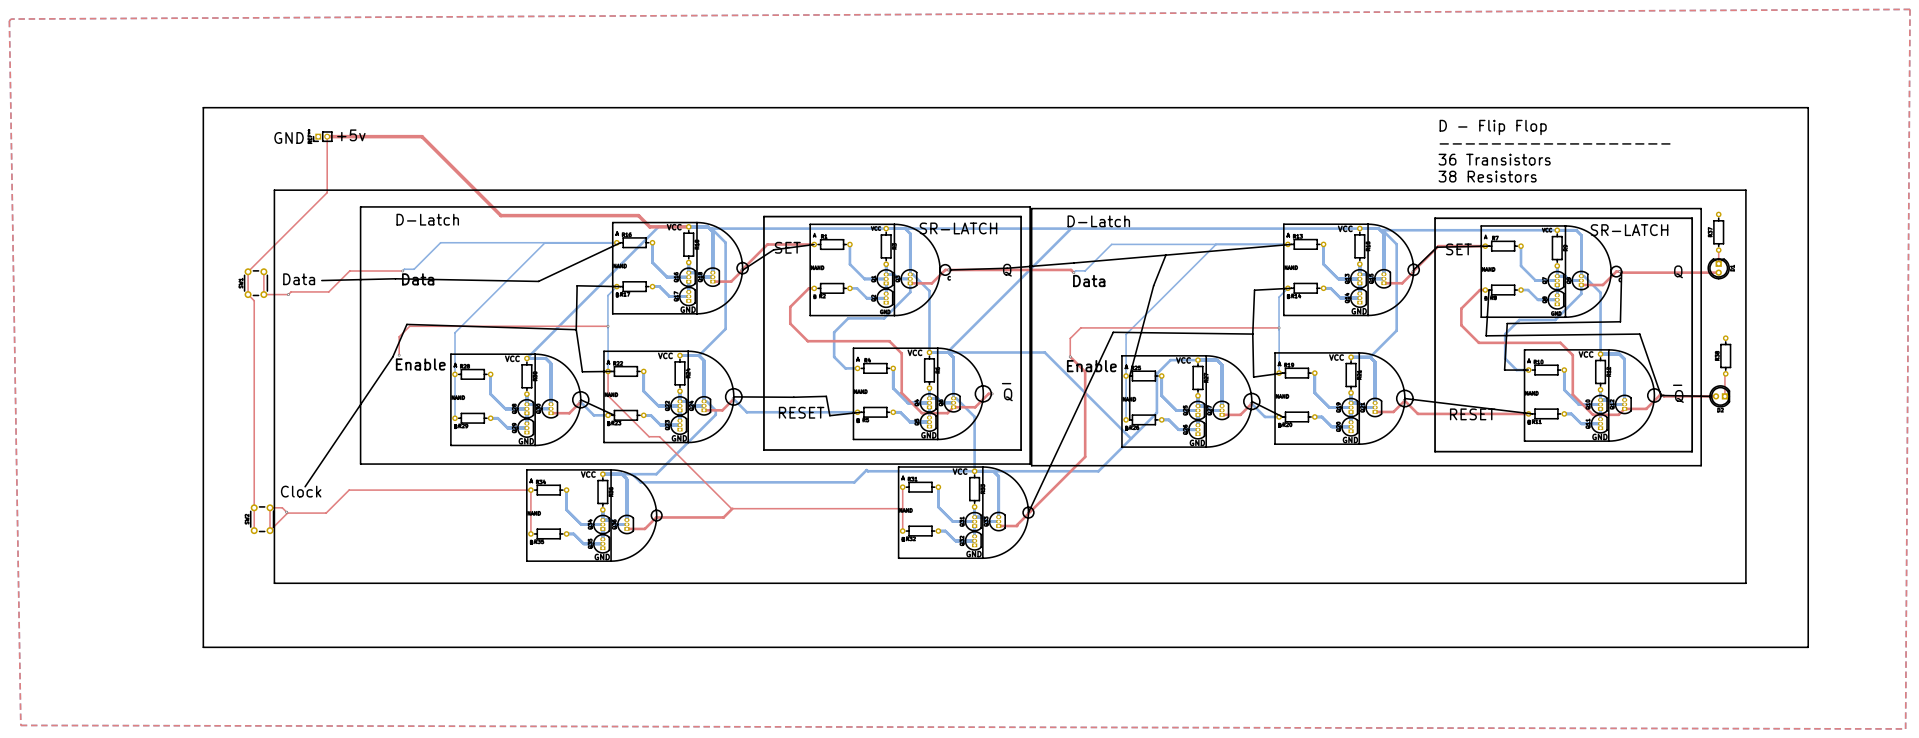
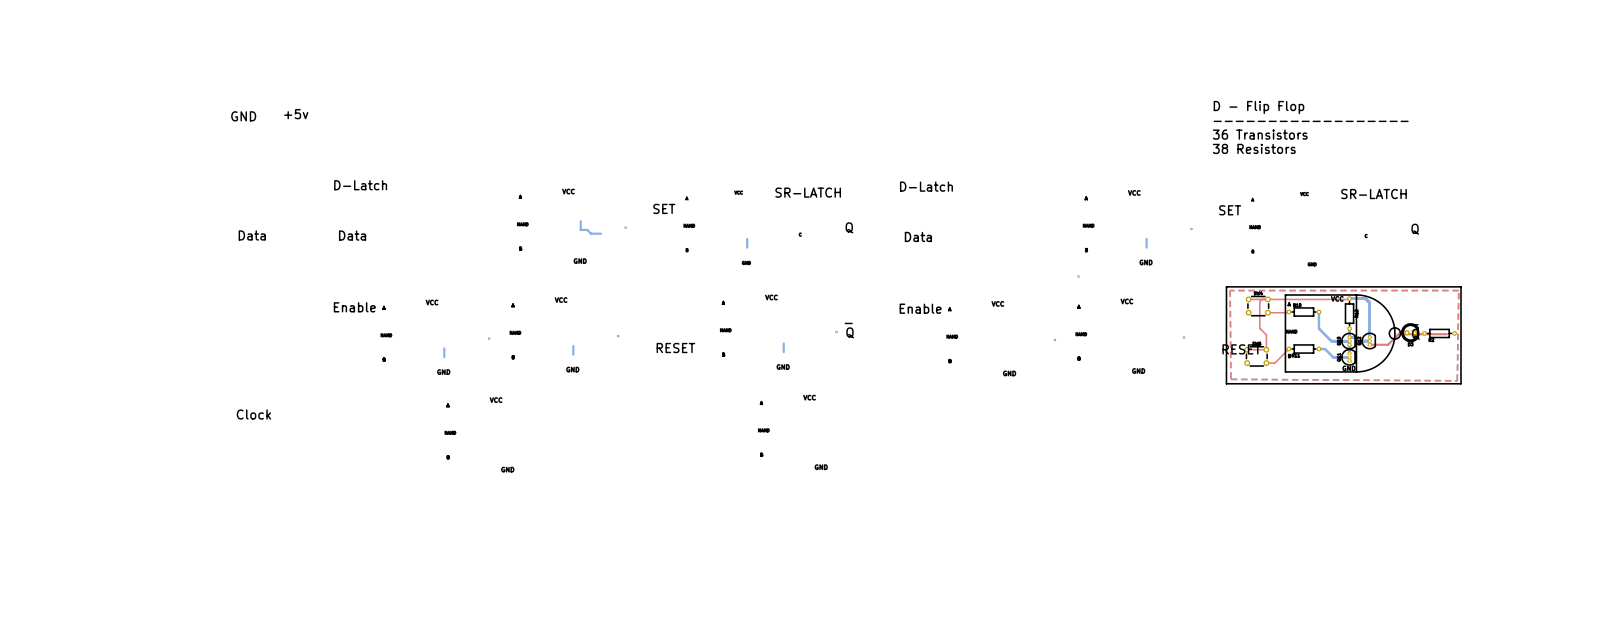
top zone outline: (1910, 9) (1905, 728) (20, 725) (9, 20) (11, 19) (1910, 9) -> none
board edge: (203, 107) (1808, 107) (1808, 647) (203, 647) (203, 107) -> none
part: (322, 136) -> none
top track: (327, 136) (327, 192) (248, 271) (248, 294) (254, 300) (254, 530) -> none
top track: (327, 136) (422, 136) (500, 215) (638, 215) (649, 226) (688, 226) -> none
line: (274, 190) (1745, 190) (1745, 583) (274, 583) (274, 190) -> none
line: (360, 206) (1030, 206) (1030, 464) (360, 464) (360, 206) -> none
line: (1031, 208) (1701, 208) (1701, 465) (1031, 465) (1031, 208) -> none
line: (763, 216) (1021, 216) (1021, 450) (763, 450) (763, 216) -> none
line: (1435, 218) (1692, 218) (1692, 451) (1435, 451) (1435, 218) -> none
line: (696, 222) (612, 222) (612, 313) (696, 313) -> none
line: (696, 222) (696, 313) -> none
line: (696, 222) (715, 226) (729, 235) (739, 252) (742, 268) (739, 284) (729, 300) (715, 309) (696, 313) -> none
line: (894, 224) (810, 224) (810, 315) (894, 315) -> none
line: (894, 224) (894, 315) -> none
line: (894, 224) (913, 228) (926, 237) (935, 250) (940, 269) (935, 288) (926, 302) (910, 312) (894, 315) -> none
line: (1368, 224) (1283, 224) (1283, 315) (1368, 315) -> none
line: (1368, 224) (1368, 315) -> none
line: (1368, 224) (1387, 228) (1400, 237) (1410, 253) (1413, 269) (1410, 285) (1400, 302) (1383, 312) (1368, 315) -> none
line: (1565, 225) (1481, 225) (1481, 317) (1565, 317) -> none
line: (1565, 225) (1565, 317) -> none
line: (1565, 225) (1581, 228) (1597, 239) (1606, 252) (1611, 271) (1606, 290) (1597, 303) (1581, 314) (1565, 317) -> none
bottom track: (709, 228) (1378, 228) (1383, 233) (1383, 274) -> none
bottom track: (711, 228) (725, 242) (725, 328) (699, 355) -> none
bottom track: (905, 228) (910, 233) (910, 274) (912, 274) (929, 291) (929, 352) (1044, 352) (1131, 438) -> none
bottom track: (1071, 228) (947, 352) -> none
bottom track: (1380, 230) (1576, 230) (1581, 235) (1581, 276) (1583, 276) (1600, 292) (1600, 354) -> none
bottom track: (1382, 230) (1396, 244) (1396, 330) (1370, 357) -> none
part: (1718, 232) -> none
bottom track: (544, 242) (455, 332) (455, 418) -> none
bottom track: (616, 242) (440, 242) (414, 269) (402, 271) -> none
line: (620, 242) (538, 281) (395, 278) (321, 280) -> none
part: (634, 242) -> none
bottom track: (652, 242) (652, 262) (667, 277) (688, 277) -> none
part: (688, 244) -> none
line: (814, 244) (773, 249) (742, 270) -> none
top track: (814, 244) (767, 244) (731, 281) (712, 281) -> none
part: (832, 244) -> none
bottom track: (849, 244) (849, 264) (864, 278) (886, 278) -> none
bottom track: (1215, 244) (1126, 334) (1126, 419) -> none
bottom track: (1287, 244) (1111, 244) (1085, 270) (1073, 272) -> none
line: (1291, 244) (1007, 268) (950, 269) -> none
part: (1305, 244) -> none
bottom track: (1323, 244) (1323, 264) (1338, 278) (1359, 278) -> none
part: (886, 246) -> none
part: (1359, 246) -> none
top track: (1485, 246) (1438, 246) (1402, 283) (1383, 283) -> none
line: (1488, 246) (1437, 247) (1413, 269) -> none
part: (1503, 246) -> none
bottom track: (1521, 246) (1521, 265) (1535, 280) (1557, 280) -> none
part: (1557, 248) -> none
top track: (1718, 250) (1718, 263) -> none
line: (1165, 255) (1153, 285) (1129, 376) (1129, 419) -> none
drawing: [736, 262, 749, 275] -> none
drawing: [1407, 263, 1420, 276] -> none
bottom track: (886, 264) (886, 274) (894, 274) (898, 278) (910, 278) -> none
drawing: [939, 264, 951, 276] -> none
bottom track: (1359, 264) (1359, 274) (1367, 274) (1372, 278) (1383, 278) -> none
bottom track: (1557, 265) (1557, 276) (1565, 276) (1569, 280) (1581, 280) -> none
drawing: [1610, 266, 1622, 278] -> none
part: (1718, 268) -> none
via: (948, 269) -> none
top track: (402, 271) (349, 271) (328, 291) (291, 291) (288, 294) (263, 294) (263, 271) -> none
via: (402, 271) -> none
via: (1619, 271) -> none
line: (1621, 271) (1620, 321) (1507, 323) (1504, 370) (1528, 370) -> none
bottom track: (712, 272) (712, 231) (707, 226) (658, 226) (526, 358) (545, 358) (551, 363) (551, 404) -> none
top track: (1073, 272) (1071, 269) (945, 269) (931, 283) (910, 283) -> none
via: (1073, 272) -> none
top track: (1718, 272) (1616, 271) (1602, 285) (1581, 285) -> none
part: (687, 277) -> none
part: (711, 277) -> none
part: (884, 278) -> none
part: (908, 278) -> none
part: (1358, 278) -> none
part: (1382, 278) -> none
part: (1555, 280) -> none
part: (1580, 280) -> none
bottom track: (688, 281) (688, 291) -> none
part: (255, 283) -> none
bottom track: (910, 283) (910, 292) (884, 318) (848, 318) (834, 332) (834, 356) (845, 368) (857, 368) -> none
bottom track: (1557, 285) (1557, 295) -> none
bottom track: (1581, 285) (1581, 293) (1555, 320) (1519, 320) (1505, 334) (1505, 358) (1516, 370) (1528, 370) -> none
bottom track: (616, 286) (607, 295) (608, 371) -> none
line: (620, 286) (577, 285) (576, 329) -> none
part: (634, 286) -> none
bottom track: (651, 286) (659, 286) (669, 296) (688, 296) -> none
top track: (814, 288) (808, 288) (790, 306) (790, 323) (807, 341) (889, 341) (901, 353) (901, 392) (921, 413) (947, 413) (953, 407) (975, 407) (988, 393) (992, 393) -> none
part position: (832, 288) -> (1439, 333)
bottom track: (849, 288) (857, 288) (866, 298) (886, 298) -> none
bottom track: (1287, 288) (1279, 297) (1279, 373) -> none
line: (1291, 288) (1254, 290) (1252, 334) -> none
part: (1305, 288) -> none
bottom track: (1322, 288) (1330, 288) (1340, 298) (1359, 298) -> none
top track: (1485, 290) (1479, 290) (1461, 308) (1461, 325) (1478, 342) (1560, 342) (1572, 355) (1572, 394) (1592, 414) (1618, 414) (1624, 408) -> none
line: (1488, 290) (1486, 335) (1639, 334) (1661, 395) (1709, 396) -> none
part: (1503, 290) -> none
bottom track: (1520, 290) (1528, 290) (1537, 299) (1557, 299) -> none
via: (288, 294) -> none
part: (687, 296) -> none
part: (884, 298) -> none
part: (1358, 298) -> none
part: (1555, 299) -> none
top track: (608, 326) (409, 326) (399, 336) (399, 355) -> none
via: (608, 326) -> none
top track: (1279, 327) (1080, 327) (1070, 338) (1070, 356) (1085, 371) (1085, 456) (1017, 526) (998, 526) -> none
line: (576, 329) (582, 371) (611, 371) -> none
line: (576, 329) (406, 324) (392, 356) (305, 486) -> none
line: (1252, 334) (1253, 377) (1282, 373) -> none
line: (1252, 334) (1113, 332) (1028, 512) -> none
board edge: none -> (1226, 286) (1461, 286) (1461, 383) (1226, 383) (1226, 286)
top zone outline: none -> (1230, 290) (1230, 379) (1457, 380) (1458, 290) (1230, 290)
line: (937, 348) (853, 348) (853, 439) (937, 439) -> none
line: (937, 348) (937, 439) -> none
line: (937, 348) (953, 351) (969, 361) (980, 377) (983, 393) (980, 409) (969, 426) (956, 435) (937, 439) -> none
line: (688, 351) (603, 351) (603, 442) (688, 442) -> none
line: (688, 351) (688, 442) -> none
line: (688, 351) (704, 354) (720, 364) (730, 380) (733, 396) (730, 412) (720, 429) (704, 439) (688, 442) -> none
bottom track: (948, 352) (953, 357) (953, 398) (956, 398) (974, 416) (974, 471) -> none
line: (1359, 352) (1275, 352) (1275, 444) (1359, 444) -> none
line: (1359, 352) (1359, 444) -> none
line: (1359, 352) (1375, 355) (1391, 366) (1402, 382) (1404, 398) (1402, 414) (1391, 430) (1378, 440) (1359, 444) -> none
line: (535, 354) (450, 354) (450, 445) (535, 445) -> none
line: (535, 354) (535, 445) -> none
line: (535, 354) (551, 357) (567, 367) (577, 383) (580, 399) (577, 415) (567, 432) (551, 442) (535, 445) -> none
via: (399, 355) -> none
bottom track: (679, 355) (699, 355) -> none
bottom track: (699, 355) (704, 360) (704, 401) (706, 401) (715, 410) (715, 414) (656, 474) (602, 474) -> none
line: (1206, 355) (1121, 355) (1121, 447) (1206, 447) -> none
line: (1206, 355) (1206, 447) -> none
line: (1206, 355) (1225, 359) (1238, 369) (1248, 385) (1251, 401) (1248, 417) (1238, 433) (1225, 442) (1206, 447) -> none
top track: none -> (1248, 299) (1348, 299)
top track: none -> (1261, 299) (1259, 301) (1259, 328) (1266, 334) (1266, 349) (1247, 349)
via: (1070, 356) -> none
part: (1725, 356) -> none
bottom track: (1351, 357) (1370, 357) -> none
bottom track: (1370, 357) (1375, 362) (1375, 403) -> none
part: none -> (1258, 306)
part: (875, 368) -> none
bottom track: (893, 368) (893, 388) (907, 402) (929, 402) -> none
part: (929, 370) -> none
top track: none -> (1267, 312) (1288, 312)
top track: (608, 371) (608, 395) (649, 436) (659, 436) (731, 508) (902, 508) -> none
part: (625, 371) -> none
bottom track: (643, 371) (643, 391) (658, 405) (679, 405) -> none
part: (679, 373) -> none
part: (1296, 373) -> none
bottom track: (1314, 373) (1314, 392) (1329, 407) (1351, 407) -> none
top track: (1725, 373) (1724, 396) -> none
part: (472, 374) -> none
bottom track: (490, 374) (490, 394) (505, 408) (526, 408) -> none
part: (1351, 375) -> none
part: (526, 376) -> none
part: (1143, 376) -> none
bottom track: (1161, 376) (1161, 395) (1176, 410) (1197, 410) -> none
part: (1197, 377) -> none
drawing: [975, 385, 992, 403] -> none
drawing: [725, 388, 743, 406] -> none
bottom track: (929, 388) (929, 398) (937, 398) (941, 402) (953, 402) -> none
drawing: [1396, 390, 1414, 407] -> none
drawing: [572, 391, 590, 409] -> none
bottom track: (679, 391) (679, 401) (687, 401) (692, 405) (704, 405) -> none
bottom track: (1351, 392) (1351, 403) (1358, 403) (1363, 407) (1375, 407) -> none
drawing: [1243, 393, 1261, 410] -> none
bottom track: (526, 394) (526, 404) (534, 404) (539, 408) (551, 408) -> none
part: none -> (1410, 332)
bottom track: (1197, 395) (1197, 406) (1205, 406) (1210, 410) (1222, 410) -> none
line: (733, 396) (826, 396) (829, 415) (861, 412) -> none
part: (1719, 396) -> none
top track: (733, 398) (722, 410) (704, 410) -> none
bottom track: (733, 398) (746, 412) (857, 412) -> none
line: (1404, 398) (1532, 413) -> none
line: (580, 399) (614, 415) -> none
top track: (580, 401) (569, 413) (551, 413) -> none
bottom track: (580, 401) (593, 415) (608, 415) -> none
line: (1251, 401) (1282, 416) -> none
part: (928, 402) -> none
part: (952, 402) -> none
top track: (1251, 403) (1240, 414) (1222, 414) -> none
bottom track: (1251, 403) (1264, 416) (1279, 416) -> none
part: (678, 405) -> none
part: (702, 405) -> none
bottom track: (1222, 405) (1222, 365) (1217, 360) (1170, 360) (1156, 373) (1156, 412) (1098, 471) (866, 470) (854, 482) (640, 482) (632, 474) -> none
part: (1349, 407) -> none
part: (1373, 407) -> none
part: (525, 408) -> none
part: (549, 408) -> none
part: (1196, 410) -> none
part: (1220, 410) -> none
top track: (1375, 411) (1393, 411) (1404, 400) (1417, 413) (1528, 413) -> (1266, 363) (1274, 363) (1288, 349)
part: (875, 412) -> none
bottom track: (892, 412) (900, 412) (910, 422) (929, 422) -> none
bottom track: (1351, 412) (1351, 422) -> none
bottom track: (1197, 414) (1197, 425) -> none
part: (625, 415) -> none
bottom track: (642, 415) (650, 415) (660, 425) (679, 425) -> none
part: (1296, 416) -> none
bottom track: (1313, 416) (1321, 416) (1331, 426) (1351, 426) -> none
part: (472, 418) -> none
bottom track: (489, 418) (497, 418) (507, 428) (526, 428) -> none
part: (1143, 419) -> none
bottom track: (1160, 419) (1168, 419) (1178, 429) (1197, 429) -> none
part: (928, 422) -> none
part: none -> (1256, 356)
part: (678, 425) -> none
part: (1349, 426) -> none
part: (525, 428) -> none
part: (1196, 429) -> none
line: (982, 466) (898, 466) (898, 558) (982, 558) -> none
line: (982, 466) (982, 558) -> none
line: (982, 466) (998, 469) (1015, 480) (1025, 496) (1028, 512) (1025, 528) (1015, 544) (1001, 554) (982, 558) -> none
line: (611, 469) (526, 469) (526, 561) (611, 561) -> none
line: (611, 469) (611, 561) -> none
line: (611, 469) (627, 472) (643, 483) (652, 496) (656, 515) (652, 534) (643, 547) (627, 558) (611, 561) -> none
bottom track: (993, 471) (998, 476) (998, 517) -> none
bottom track: (621, 474) (626, 479) (626, 520) -> none
top track: (902, 487) (902, 531) -> none
part: (920, 487) -> none
bottom track: (938, 487) (938, 506) (953, 521) (974, 521) -> none
part: (974, 489) -> none
part: (548, 490) -> none
bottom track: (566, 490) (566, 509) (581, 524) (602, 524) -> none
part: (602, 492) -> none
bottom track: (974, 506) (974, 517) (982, 517) (986, 521) (998, 521) -> none
drawing: [1022, 506, 1035, 519] -> none
top track: (732, 508) (723, 517) (656, 517) (644, 528) (626, 528) -> none
bottom track: (602, 509) (602, 520) (610, 520) (615, 524) (626, 524) -> none
drawing: [651, 509, 663, 522] -> none
top track: (286, 512) (286, 513) (270, 530) (270, 507) (282, 507) (287, 513) (326, 513) (349, 490) (530, 490) (530, 533) -> none
via: (286, 512) -> none
part: (262, 519) -> none
part: (973, 521) -> none
part: (997, 521) -> none
part: (601, 524) -> none
part: (625, 524) -> none
bottom track: (974, 526) (974, 536) -> none
bottom track: (602, 529) (602, 539) -> none
part: (920, 531) -> none
bottom track: (937, 531) (945, 531) (955, 540) (974, 540) -> none
part: (548, 533) -> none
bottom track: (565, 533) (573, 533) (583, 543) (602, 543) -> none
part: (973, 540) -> none
part: (601, 543) -> none

